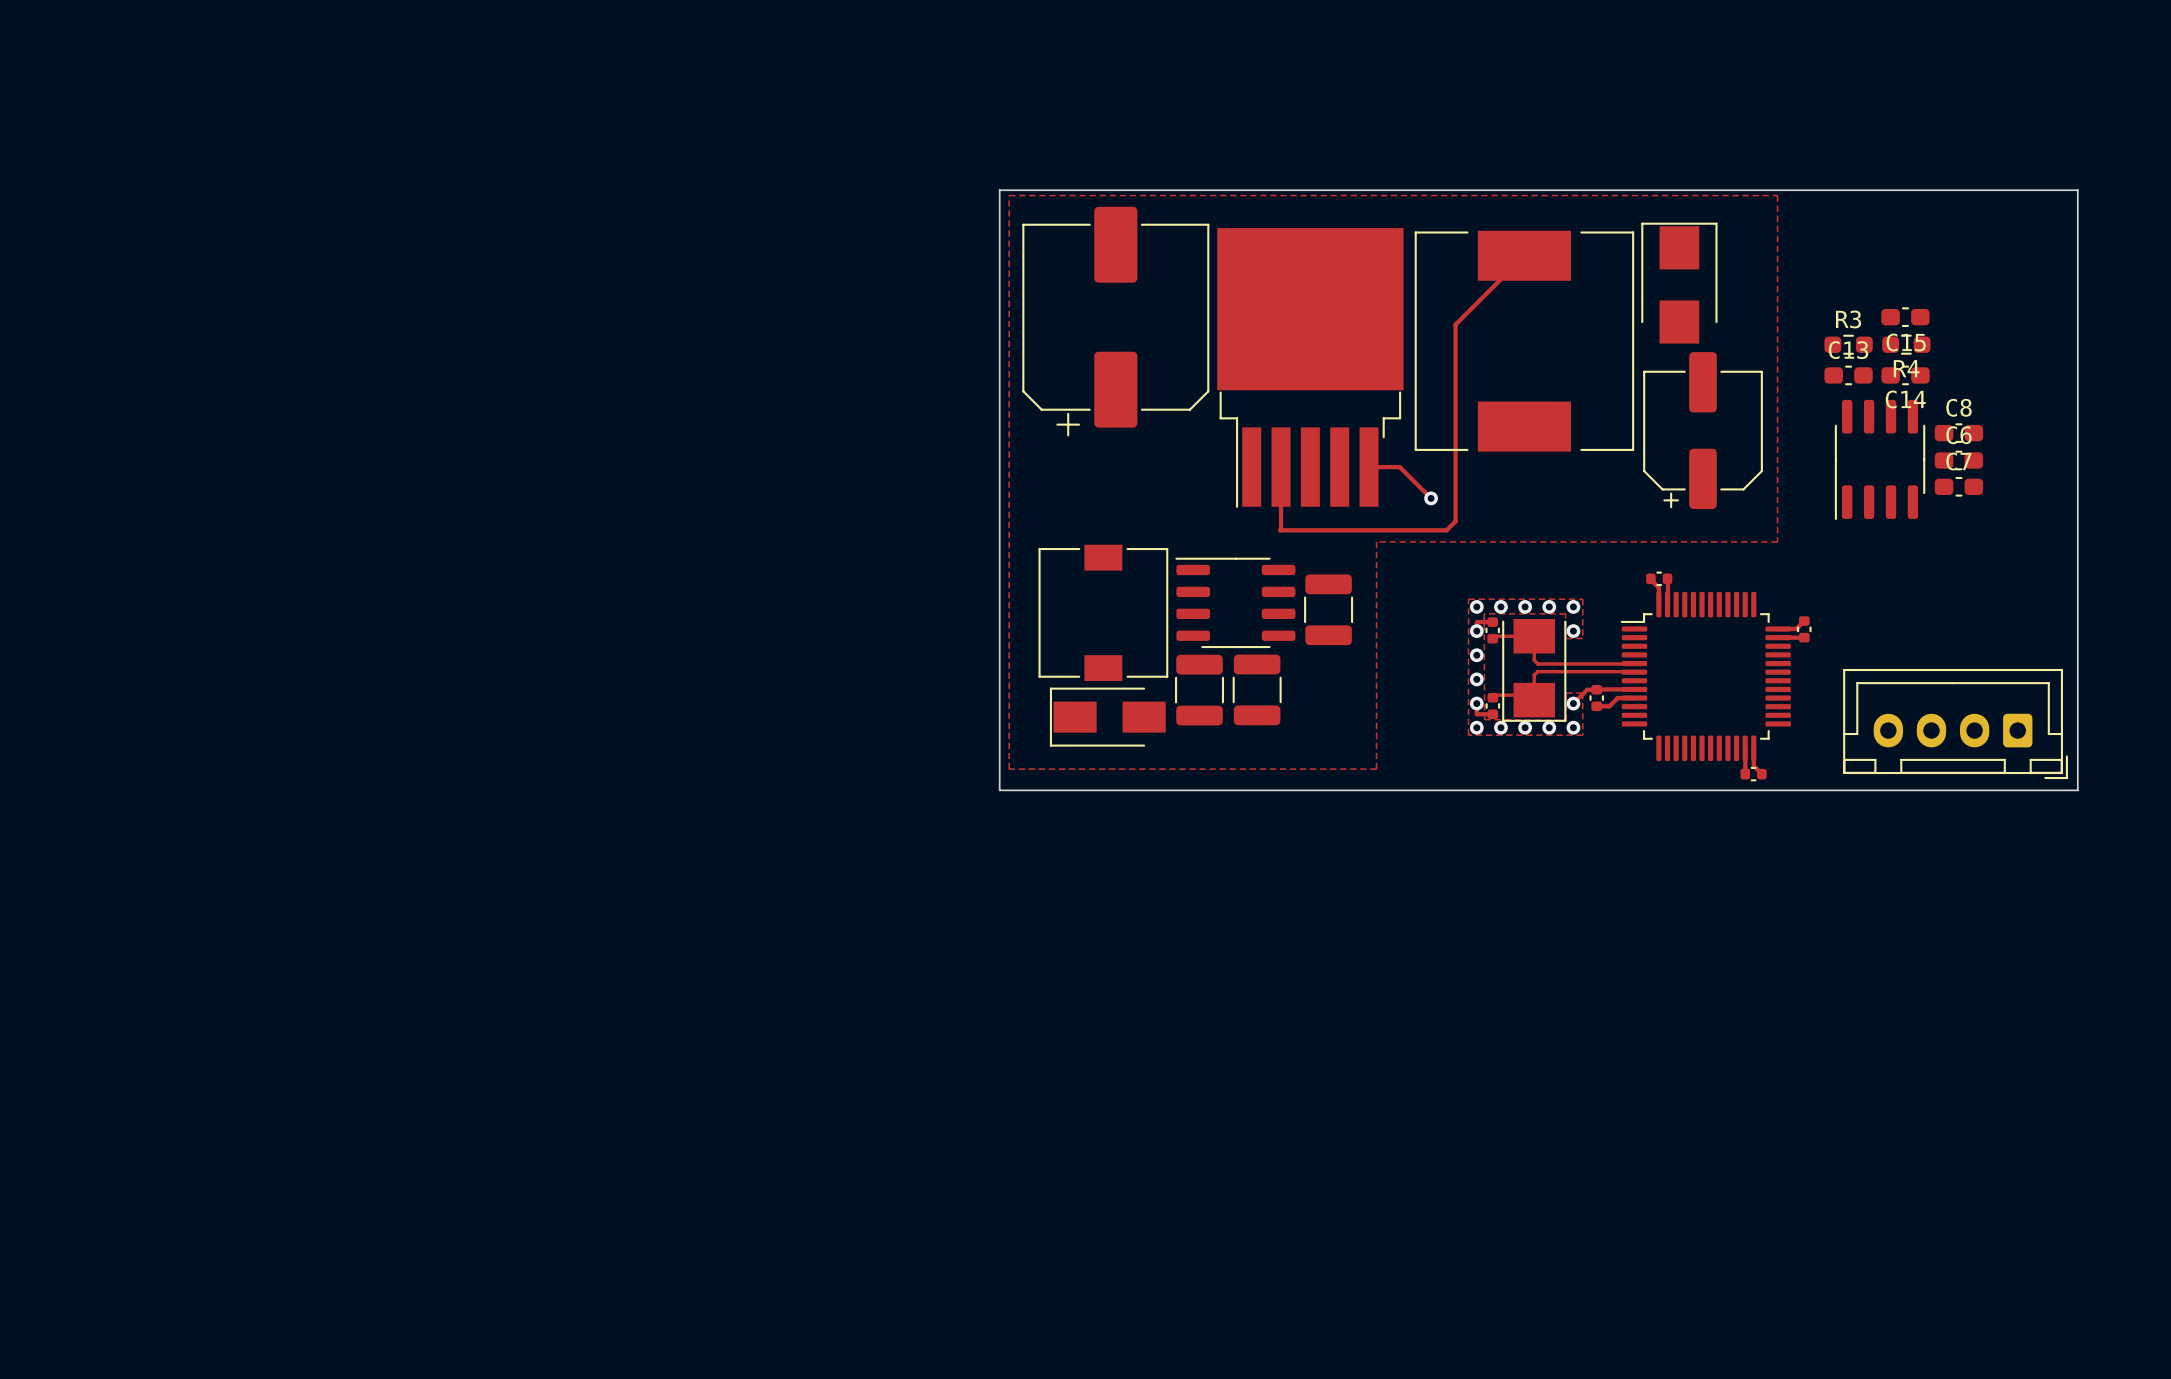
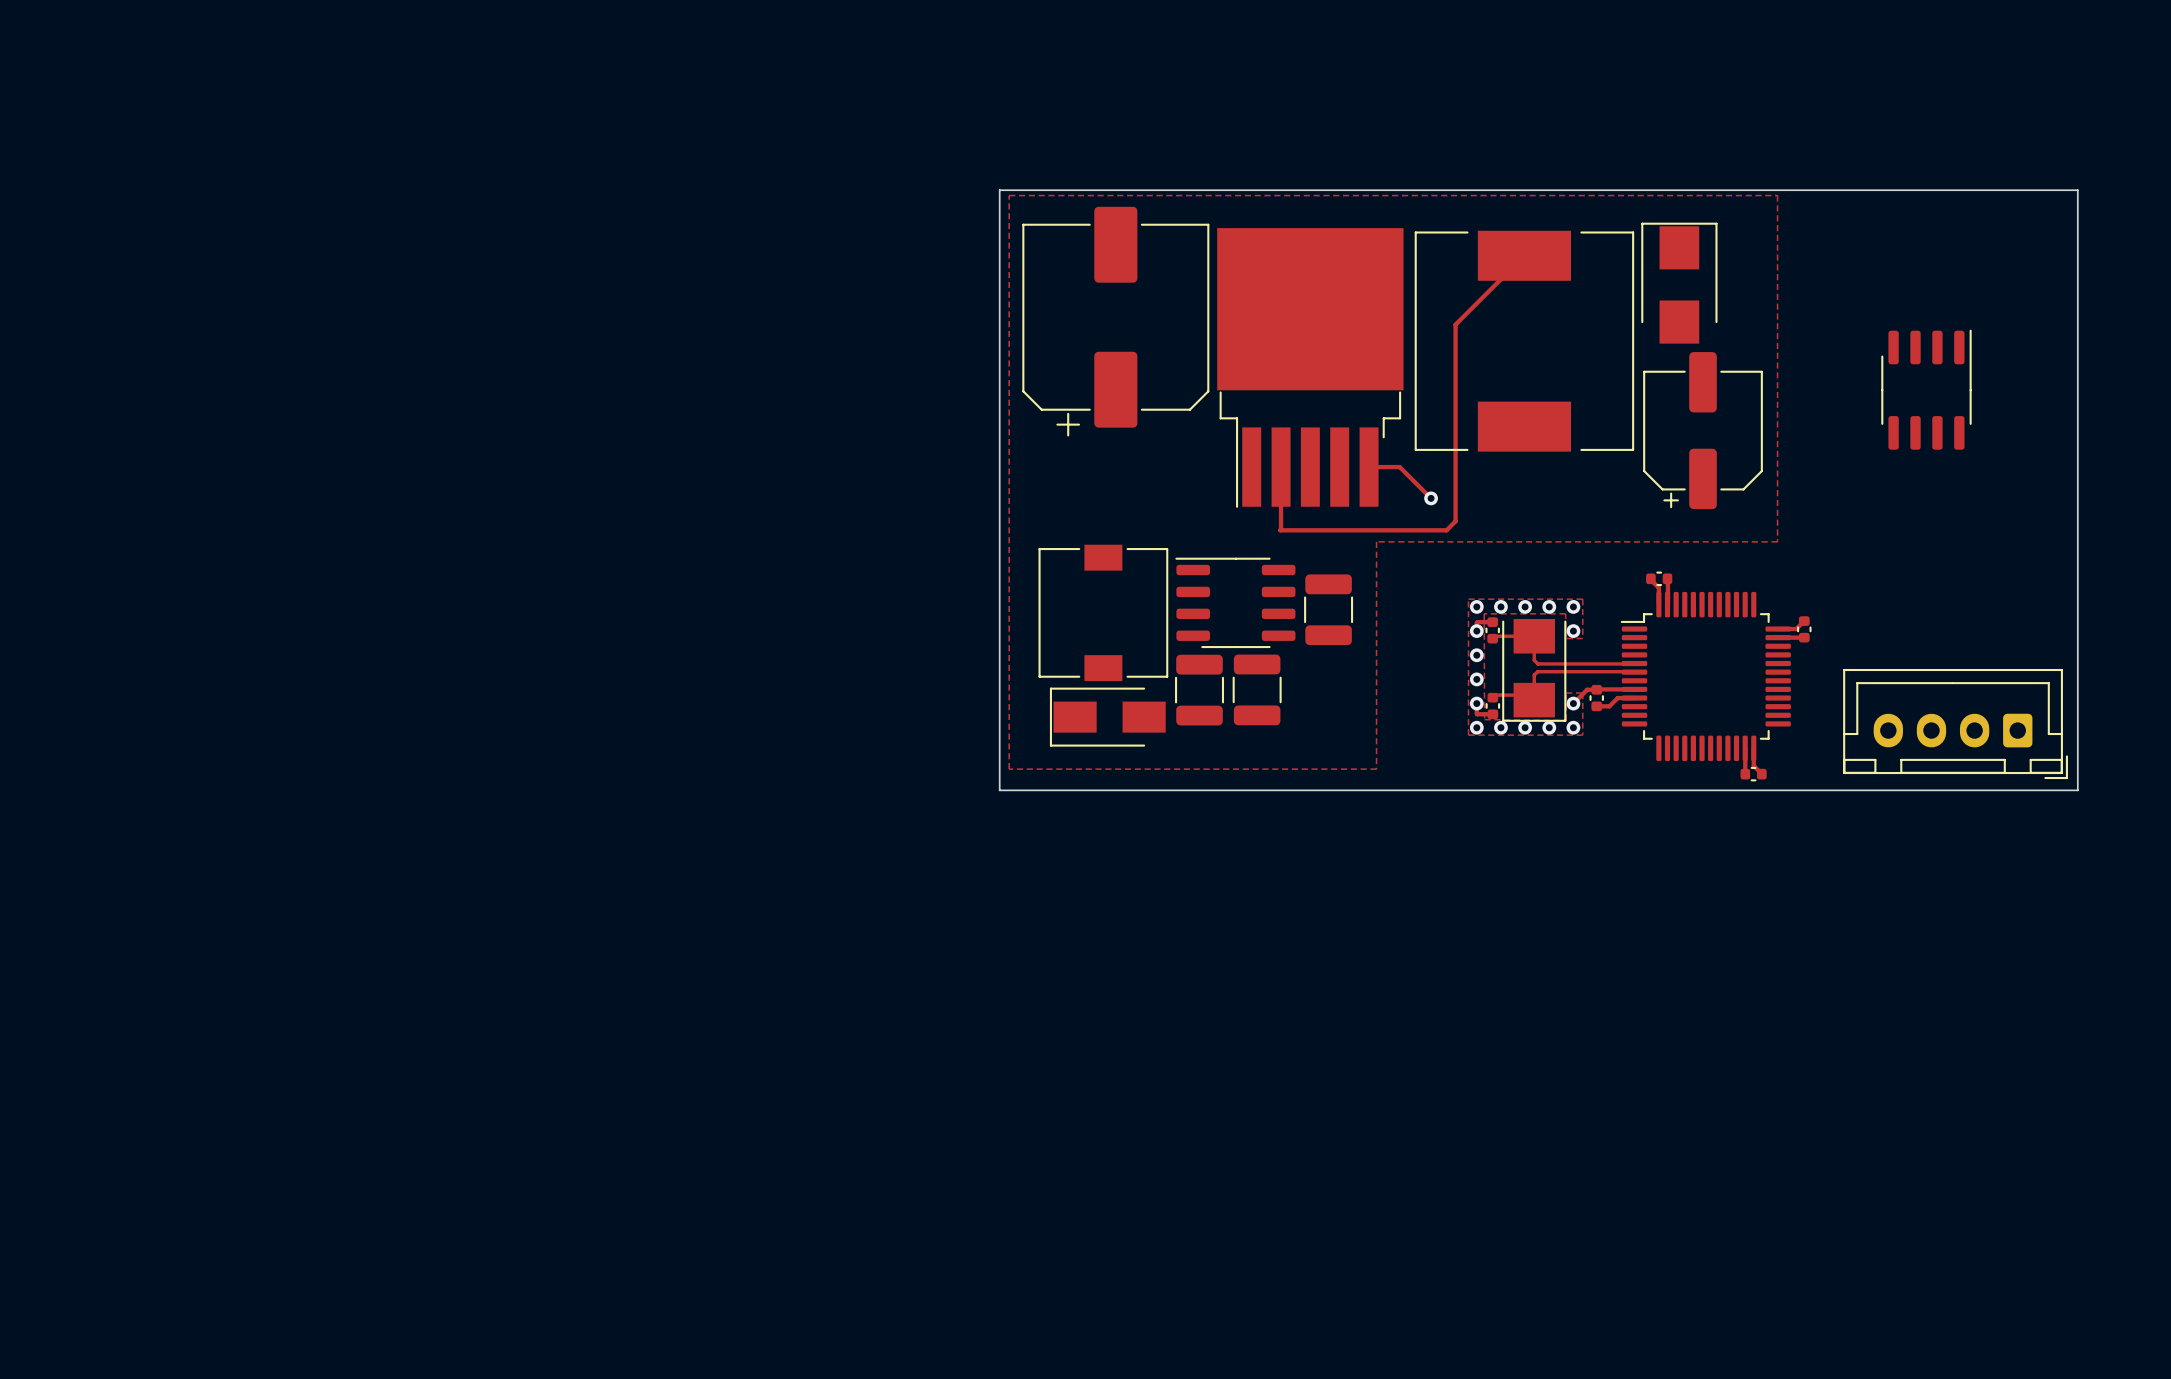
C15: (1905, 317) -> none
R3: (1848, 344) -> none
R4: (1906, 344) -> none
C13: (1848, 375) -> none
C14: (1905, 375) -> none
C8: (1958, 433) -> none
part rotation: 0° (1880, 459) -> 180° (1926, 389)
part position: (1880, 459) -> (1926, 389)
C6: (1958, 460) -> none
C7: (1958, 486) -> none

